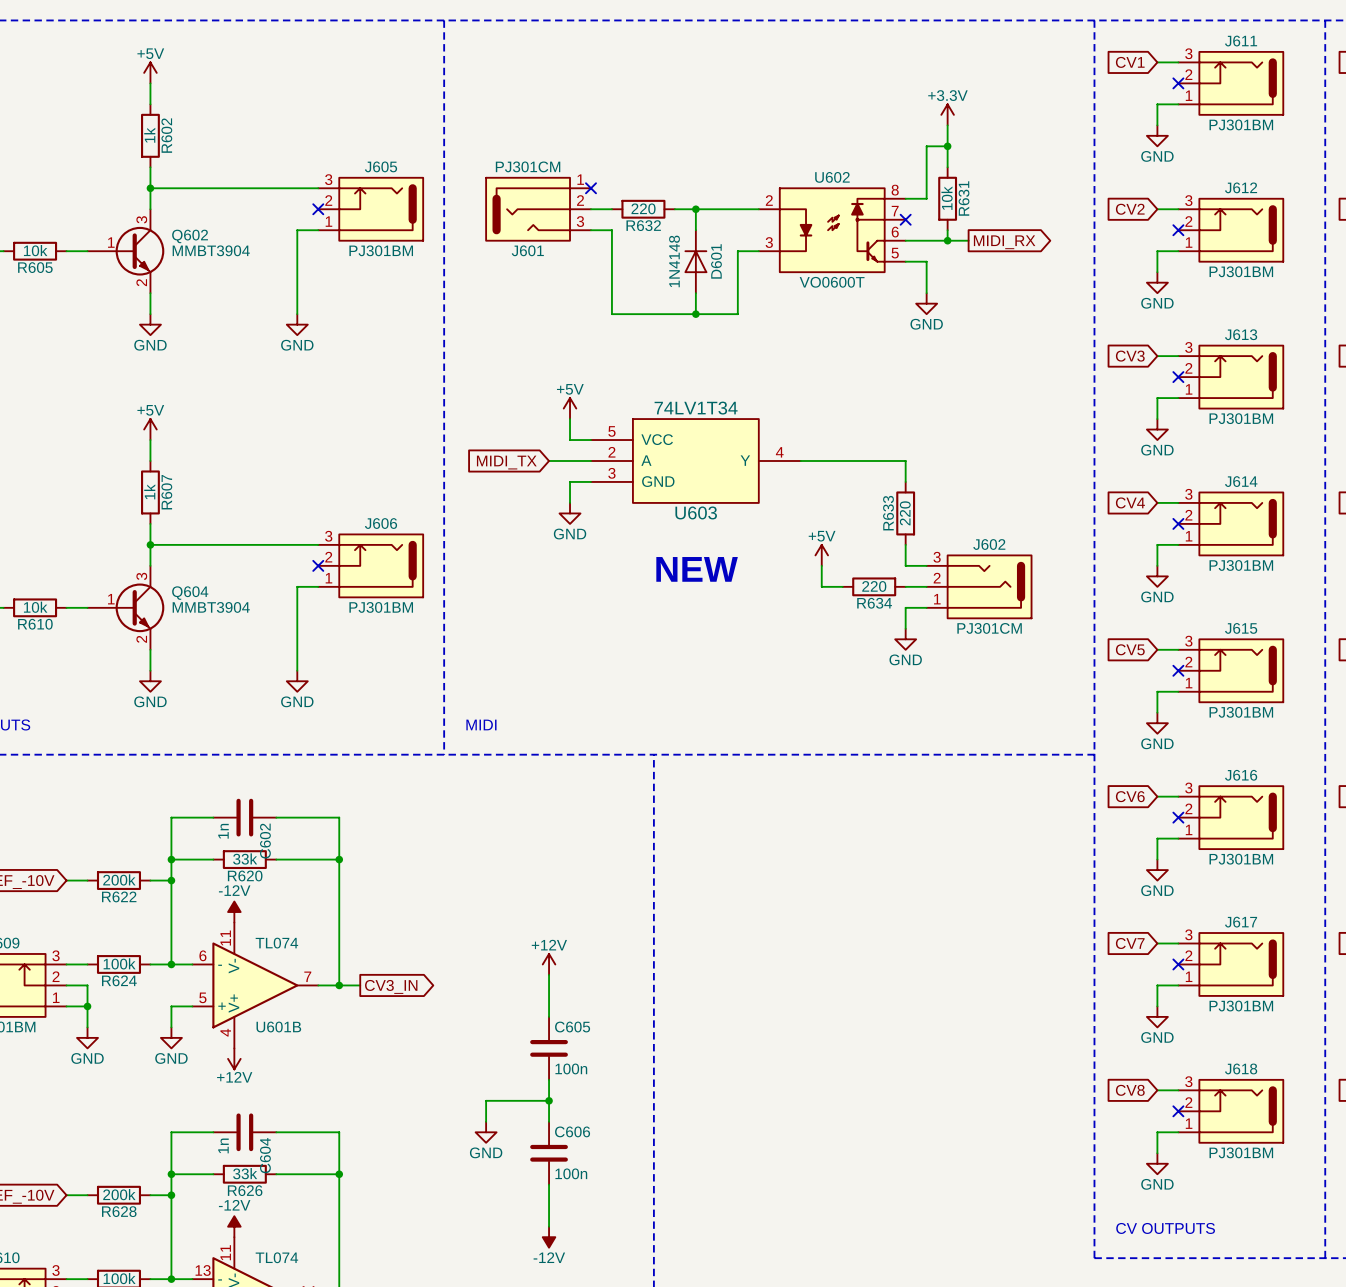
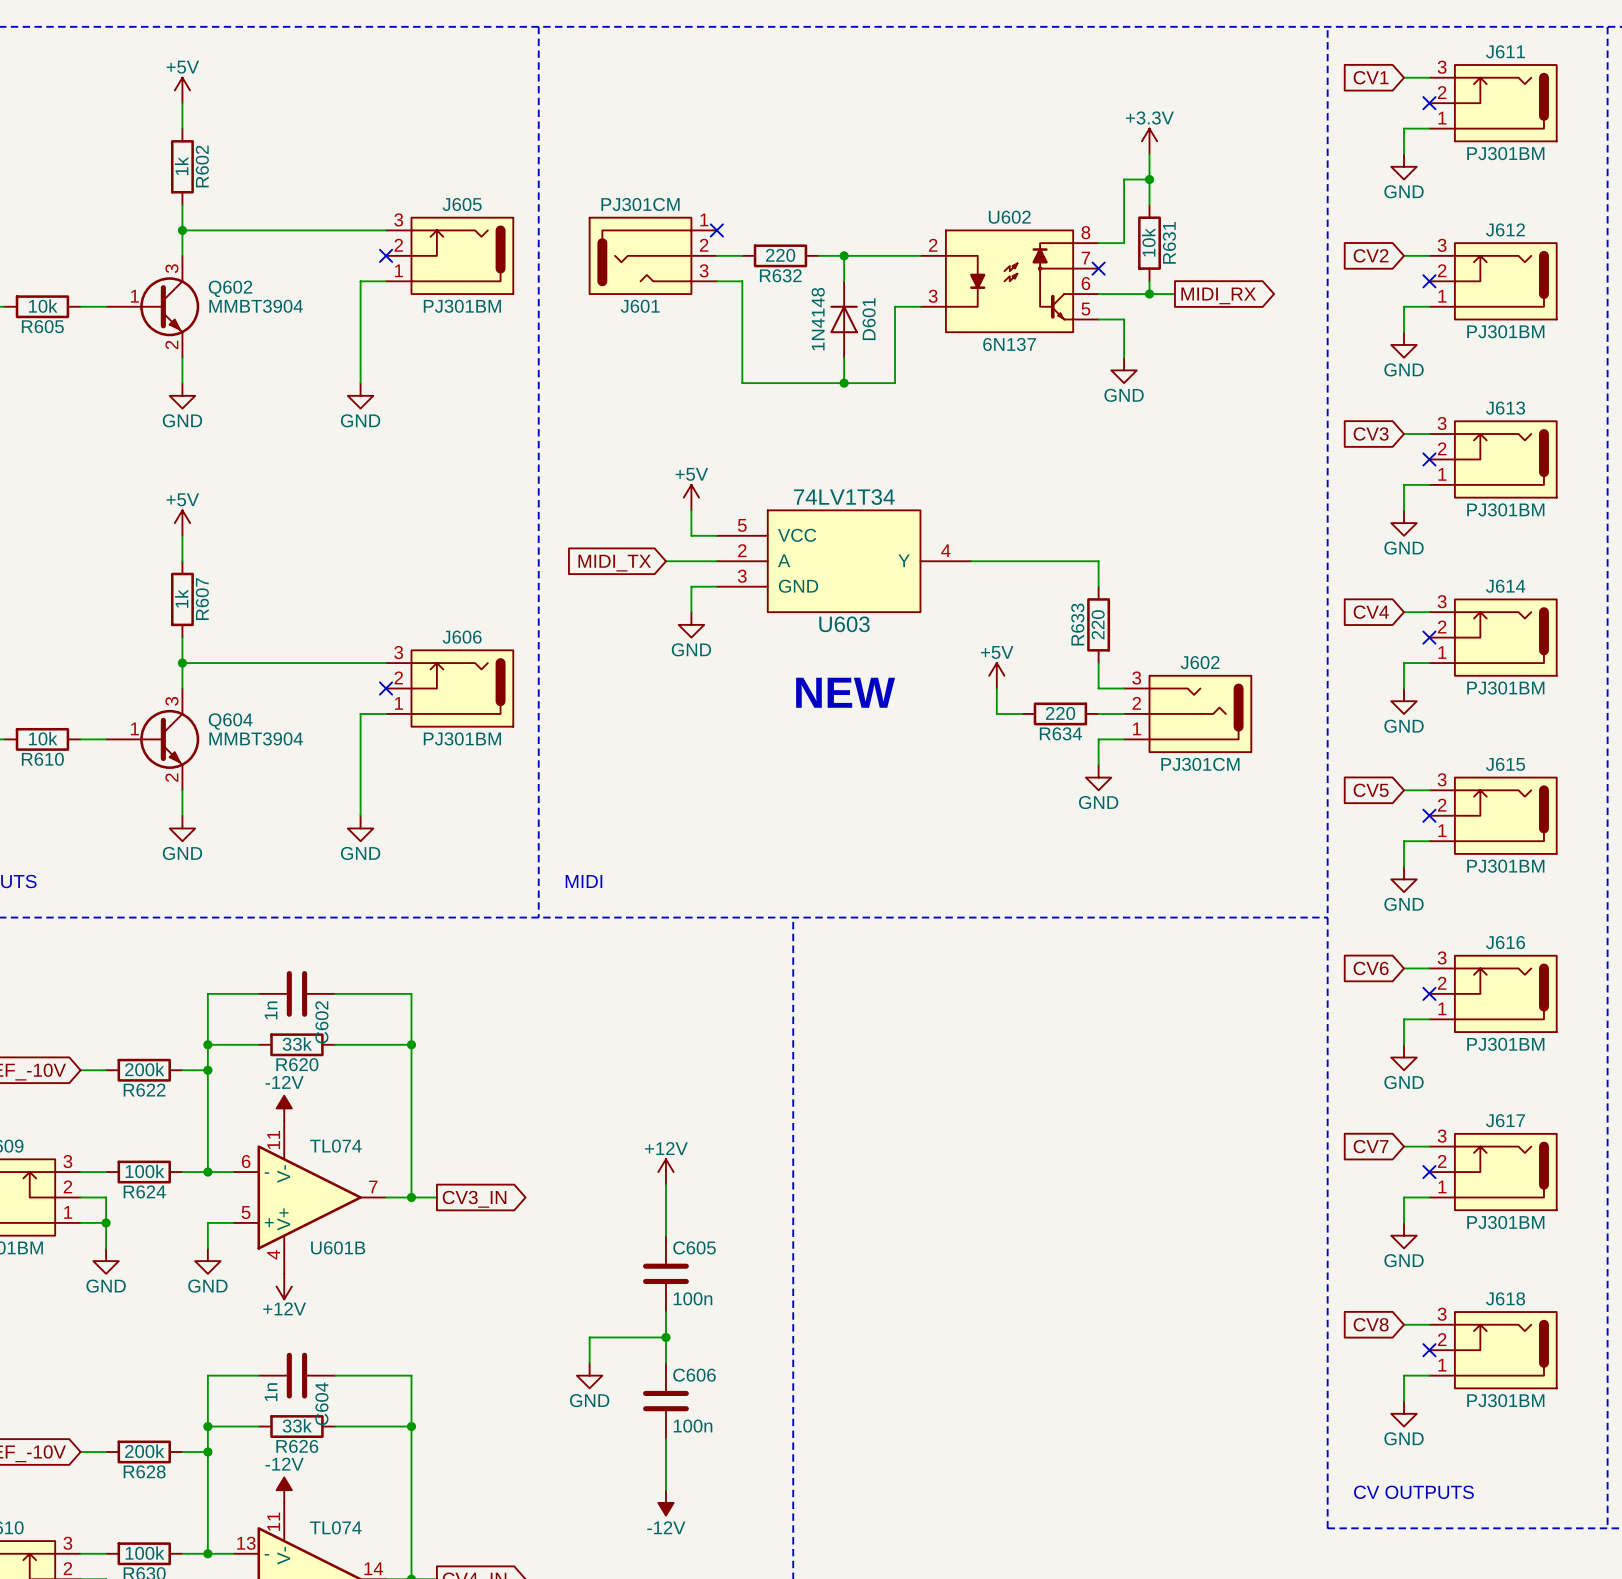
U602 value: VO0600T (832, 282) -> 6N137 (1009, 344)

